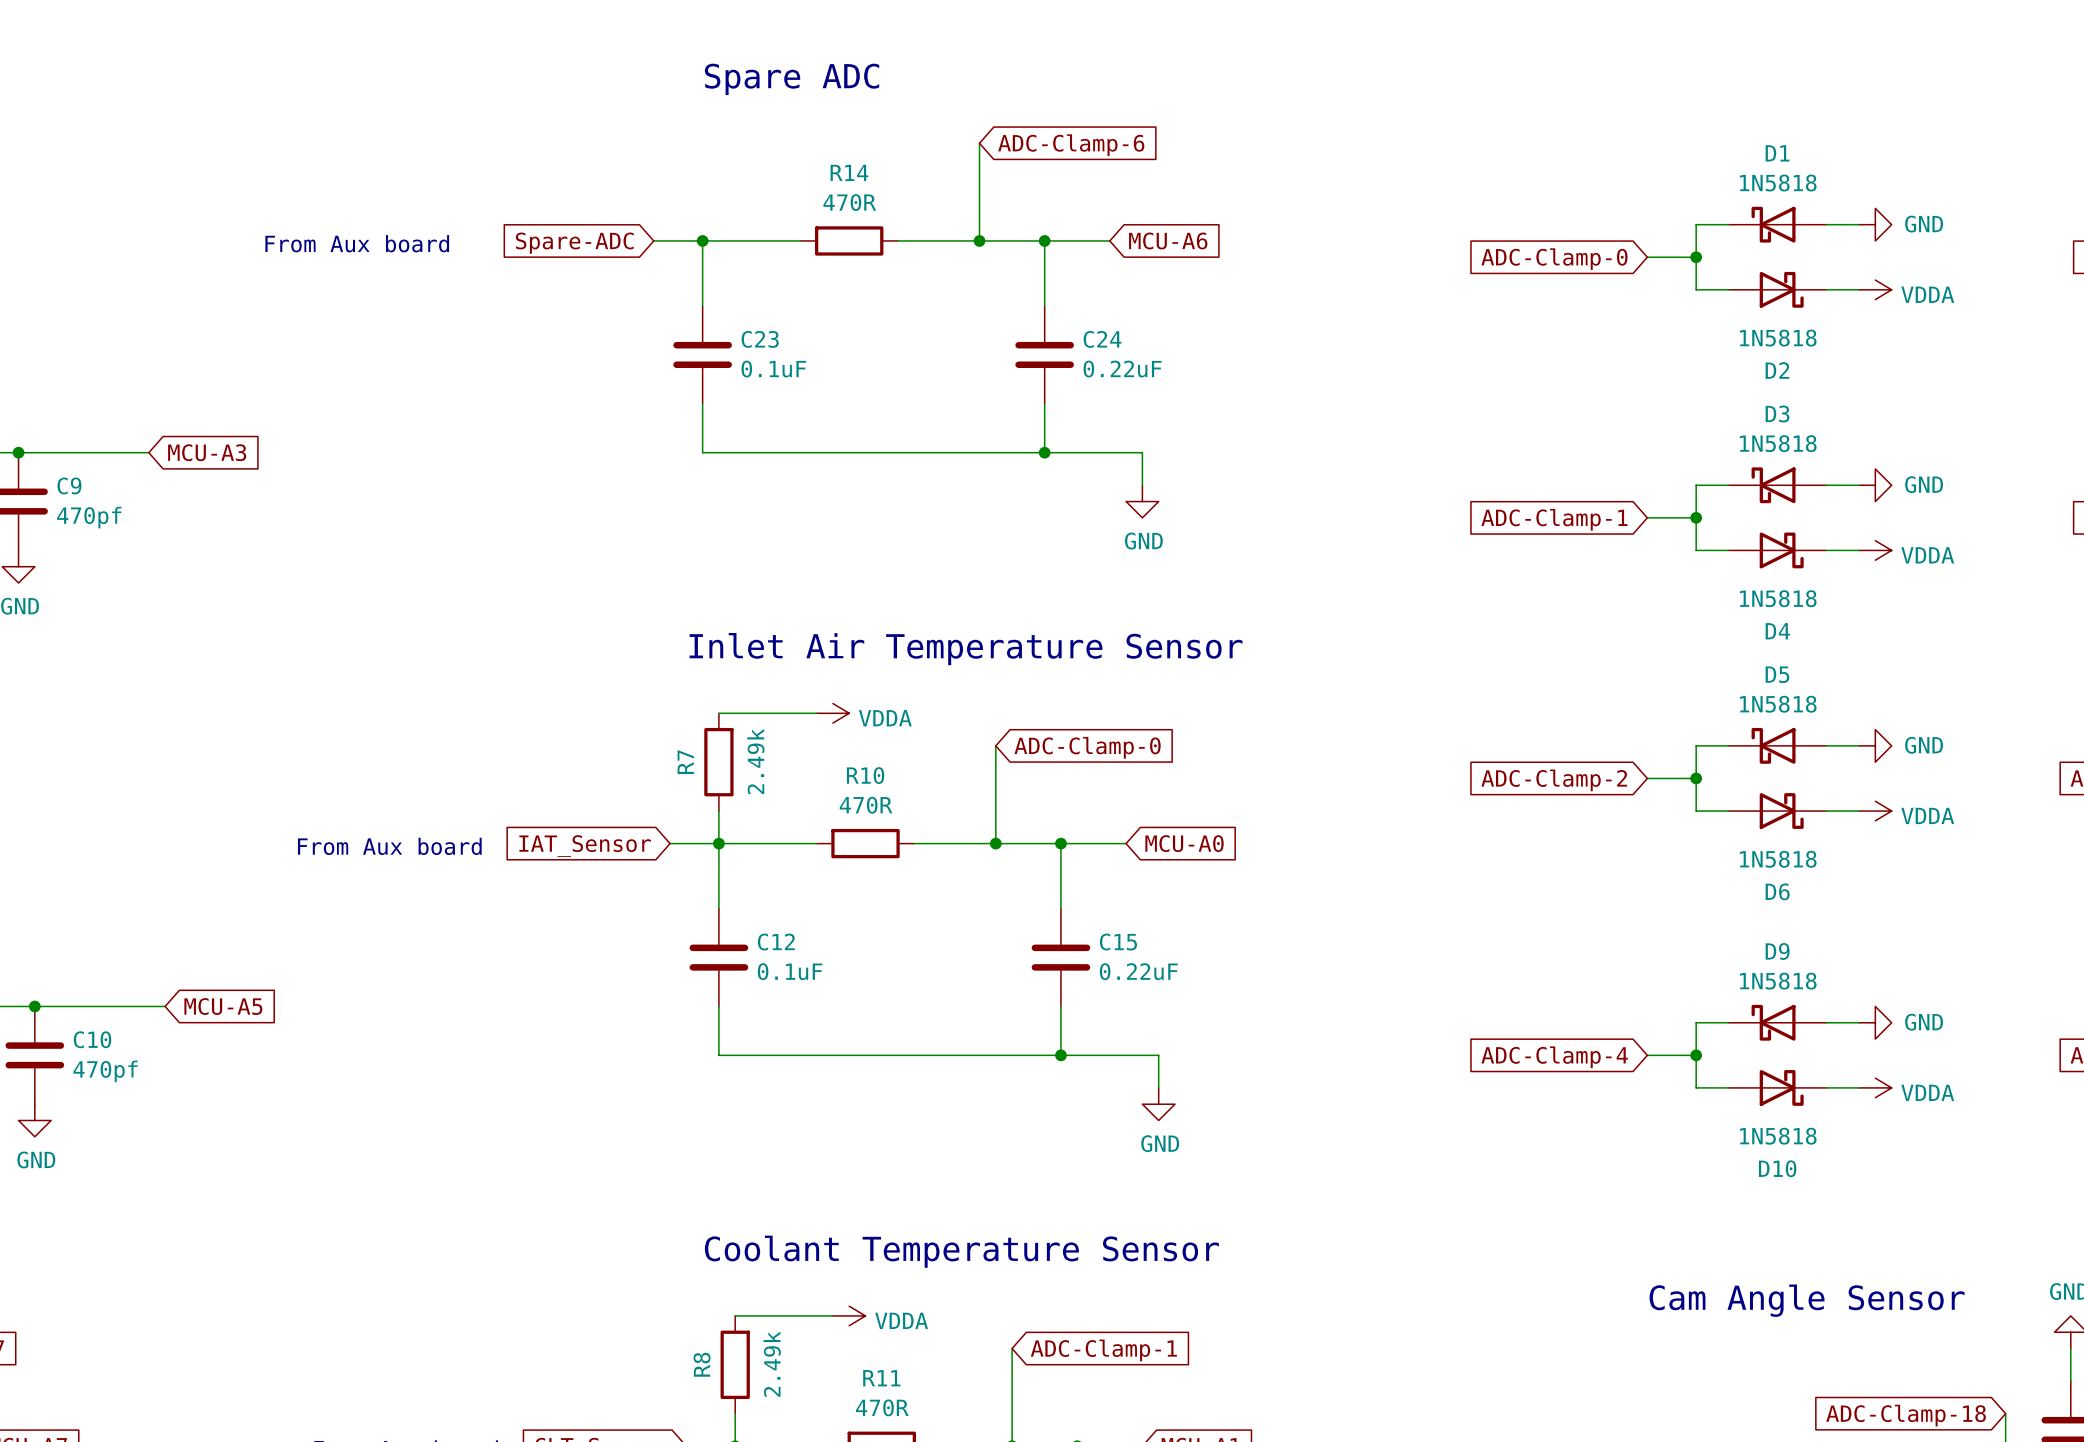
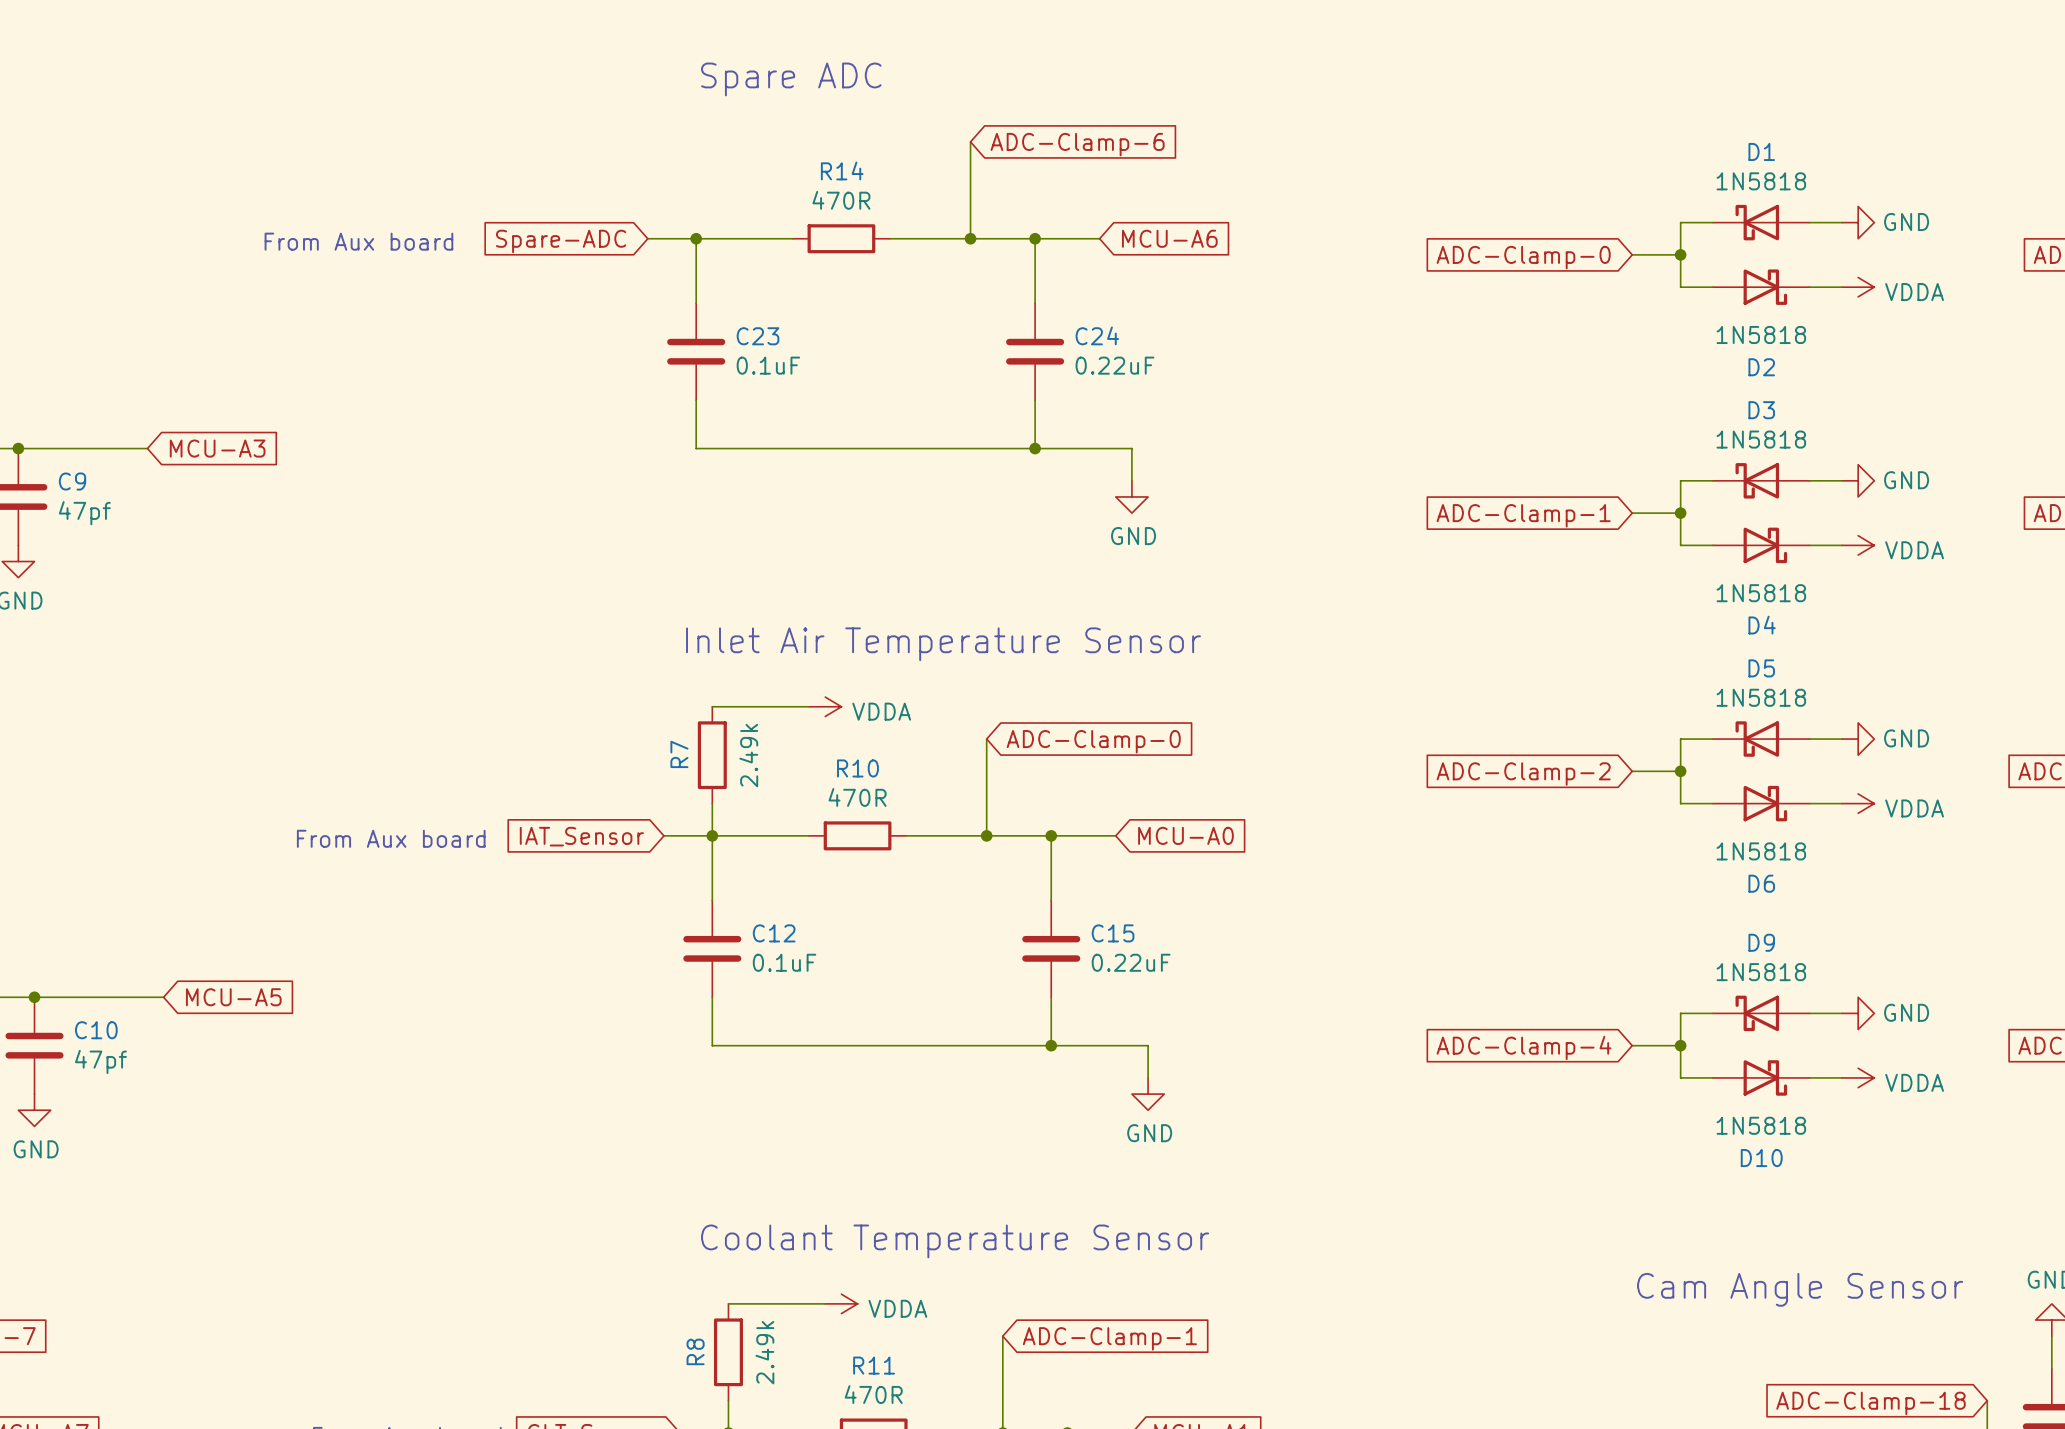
C9 value: 470pf (89, 517) -> 47pf (84, 513)
C10 value: 470pf (105, 1071) -> 47pf (100, 1061)

